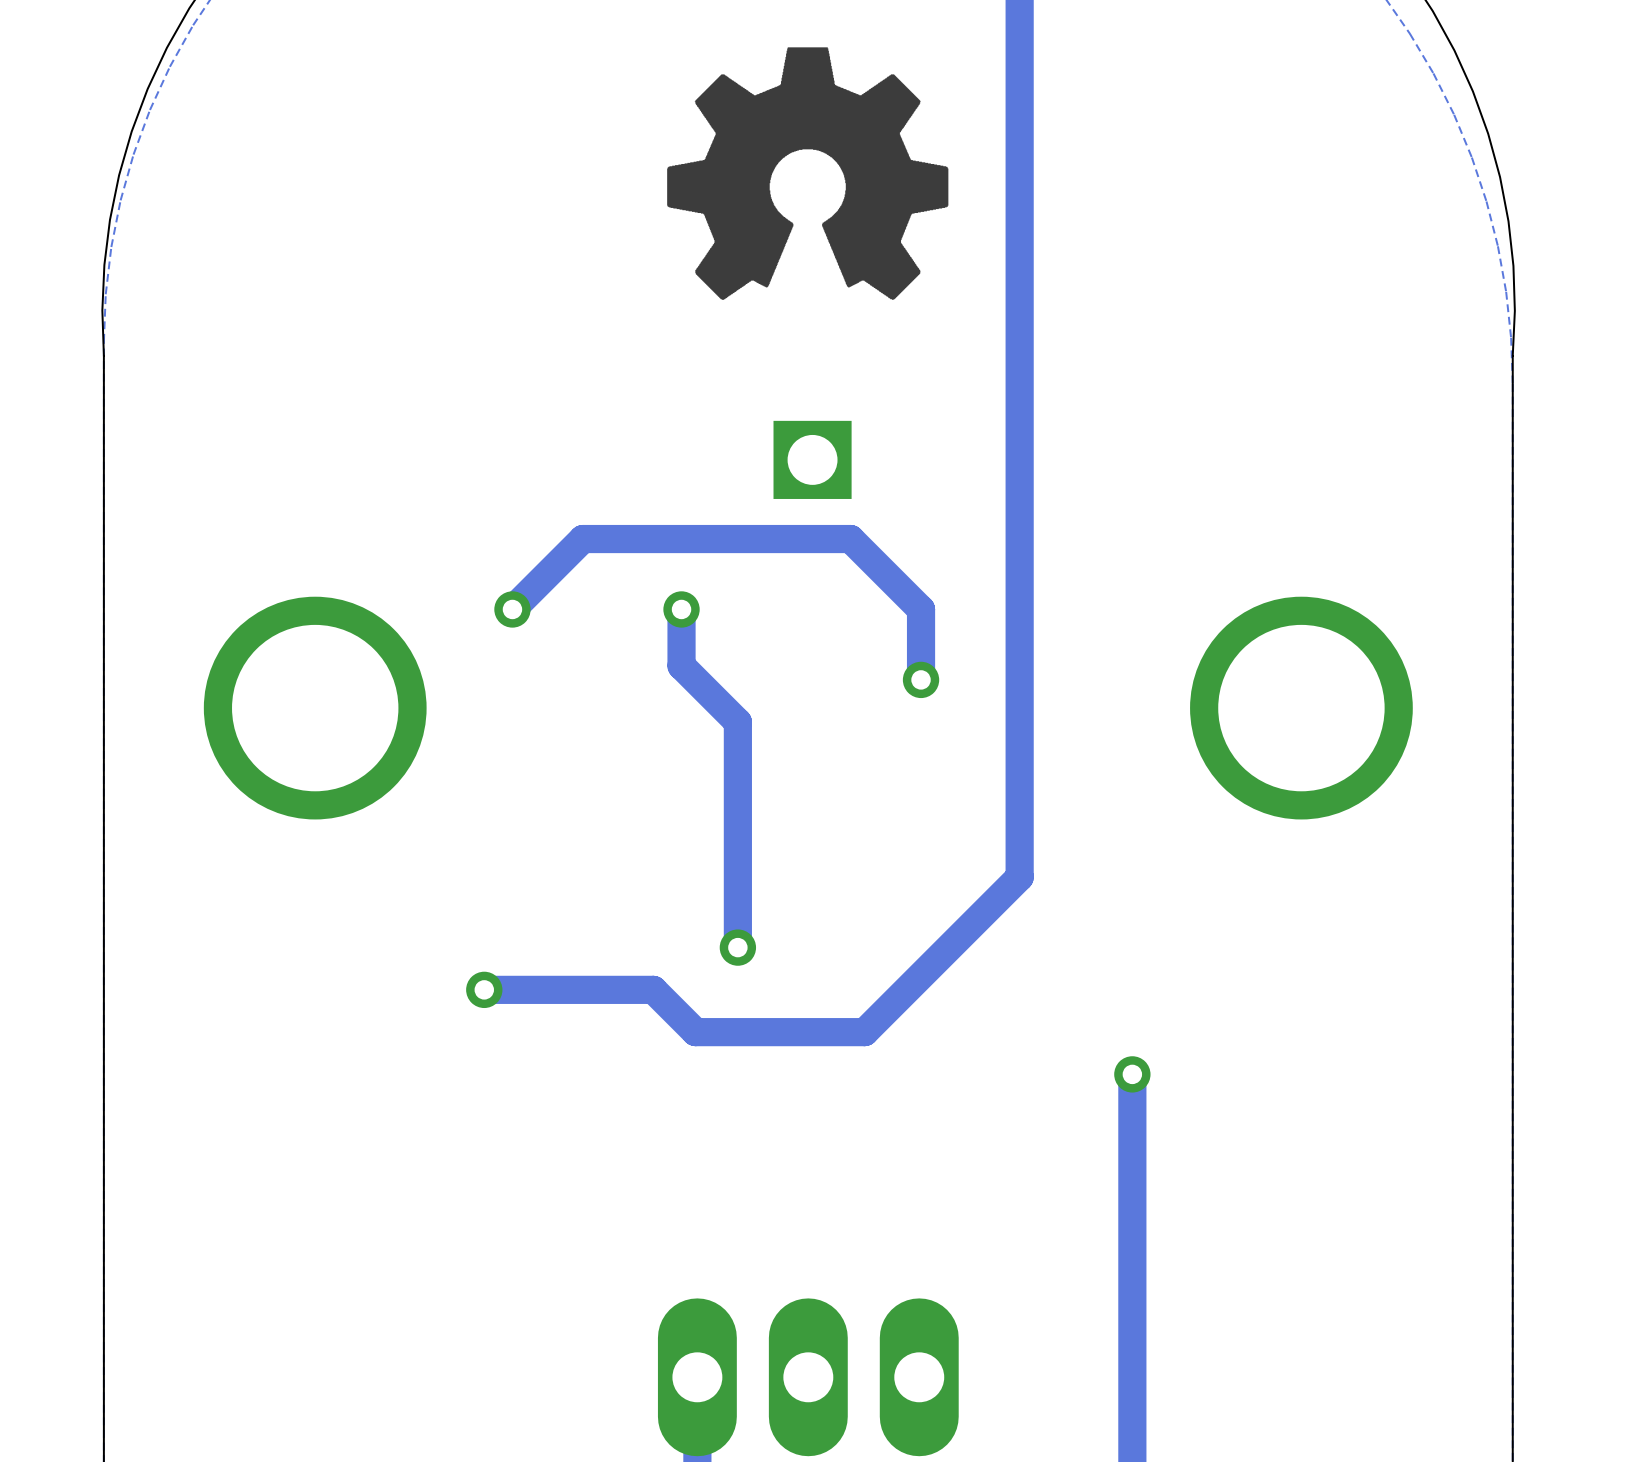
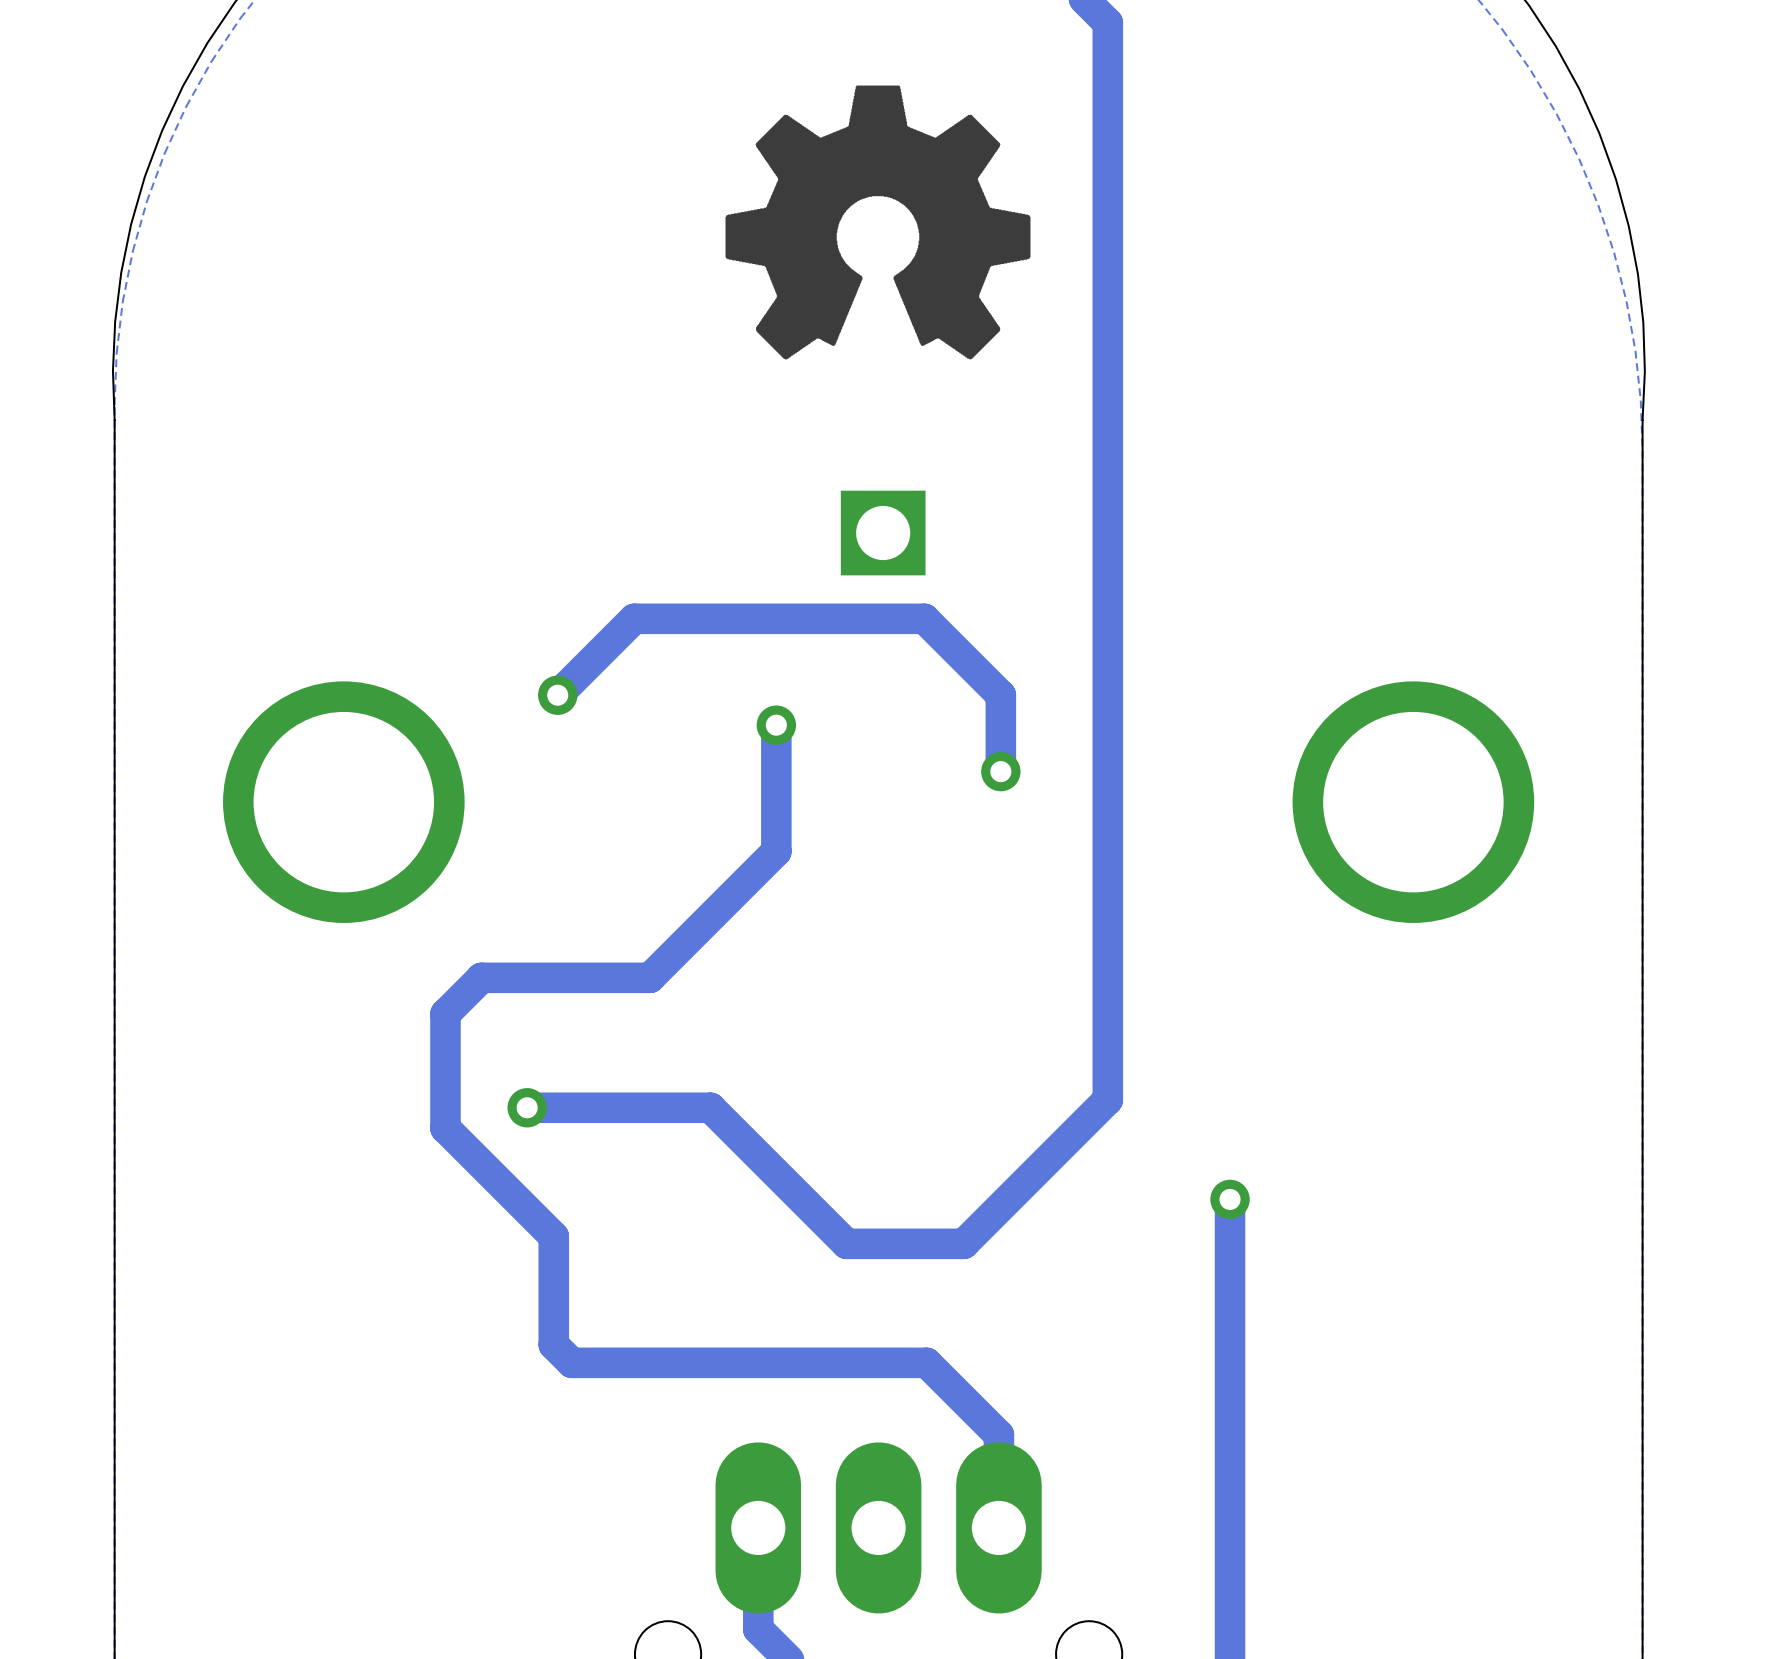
track: (681, 609) (681, 665) (737, 722) (737, 947) -> none
via position: (681, 609) -> (776, 725)
track: none -> (776, 725) (776, 851) (650, 977) (481, 977) (445, 1013) (445, 1128) (553, 1236) (553, 1344) (571, 1362) (926, 1362) (998, 1435) (998, 1527)
track: (1019, 877) (864, 1032) (695, 1032) -> (1107, 985) (1107, 1099) (963, 1243) (846, 1243) (756, 1153)
via: (737, 947) -> none

